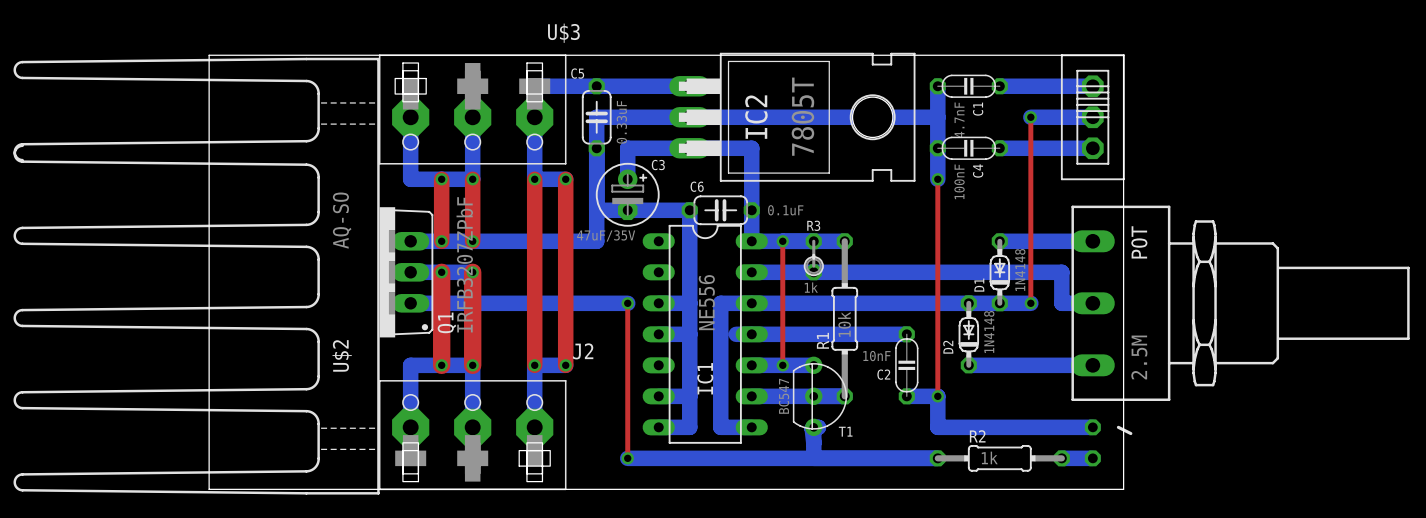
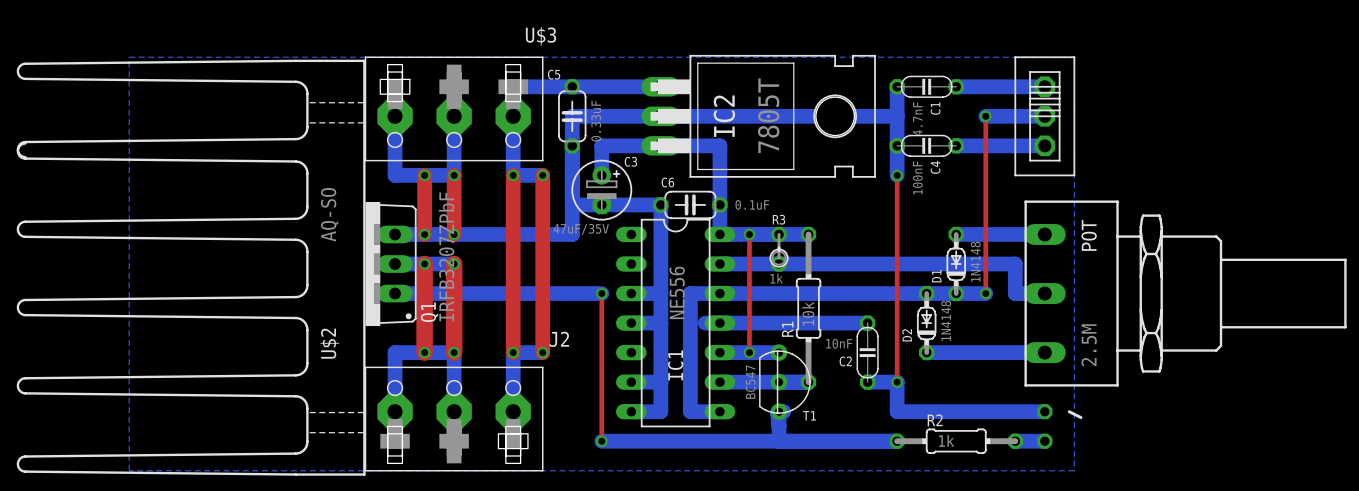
bottom zone outline: none -> (129, 57) (129, 470) (1074, 470) (1074, 57) (129, 57)
board edge: (209, 55) (209, 489) (1123, 489) (1123, 55) (209, 55) -> none

